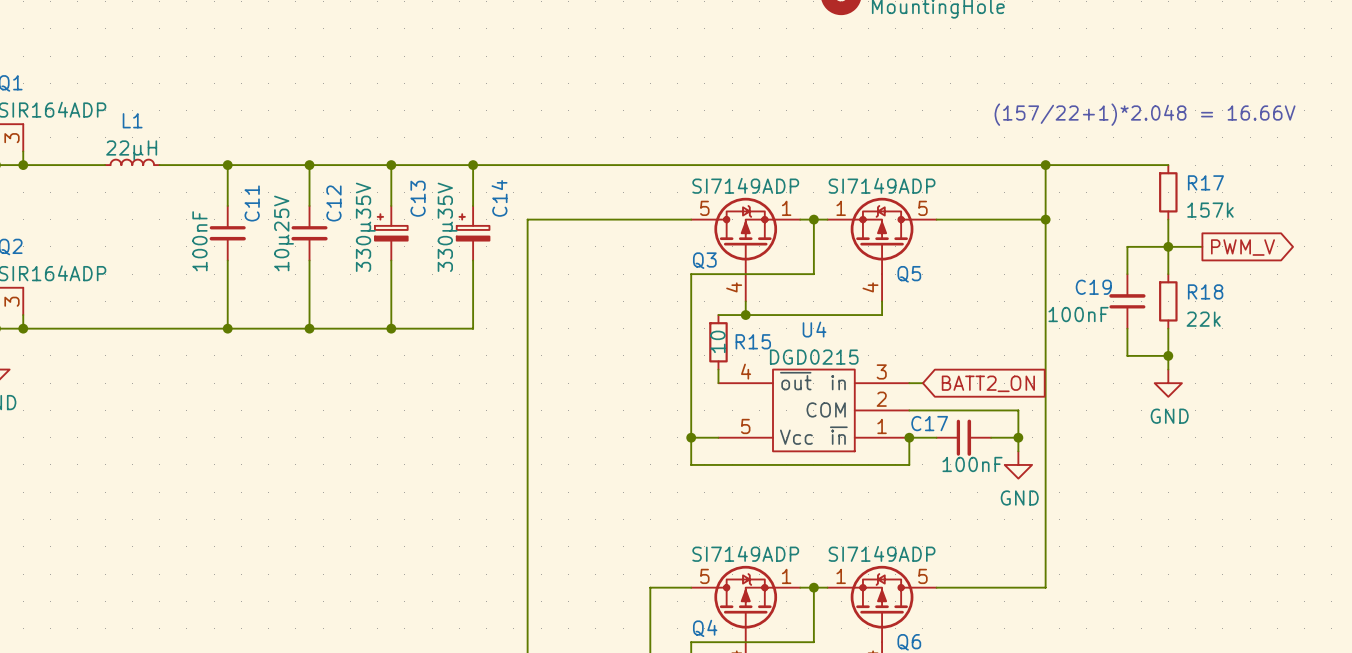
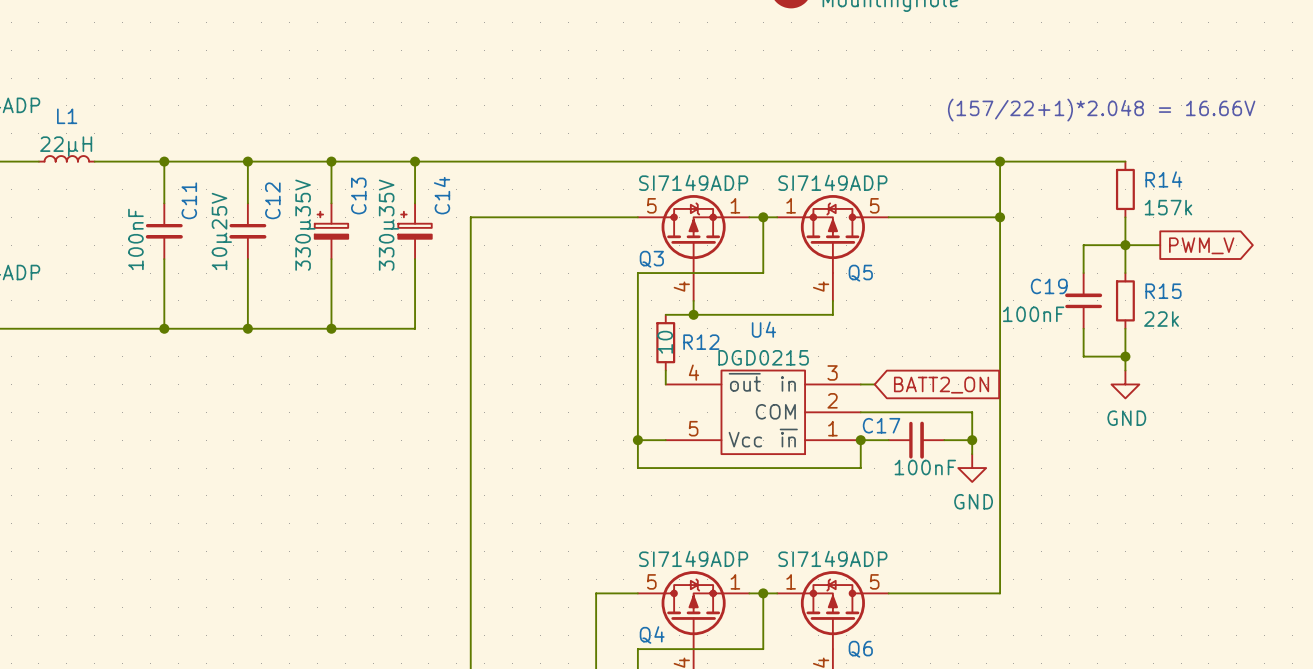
R17 name: R17 (1205, 182) -> R14 (1163, 179)
R18 name: R18 (1205, 291) -> R15 (1163, 291)
R15 name: R15 (753, 341) -> R12 (701, 342)

